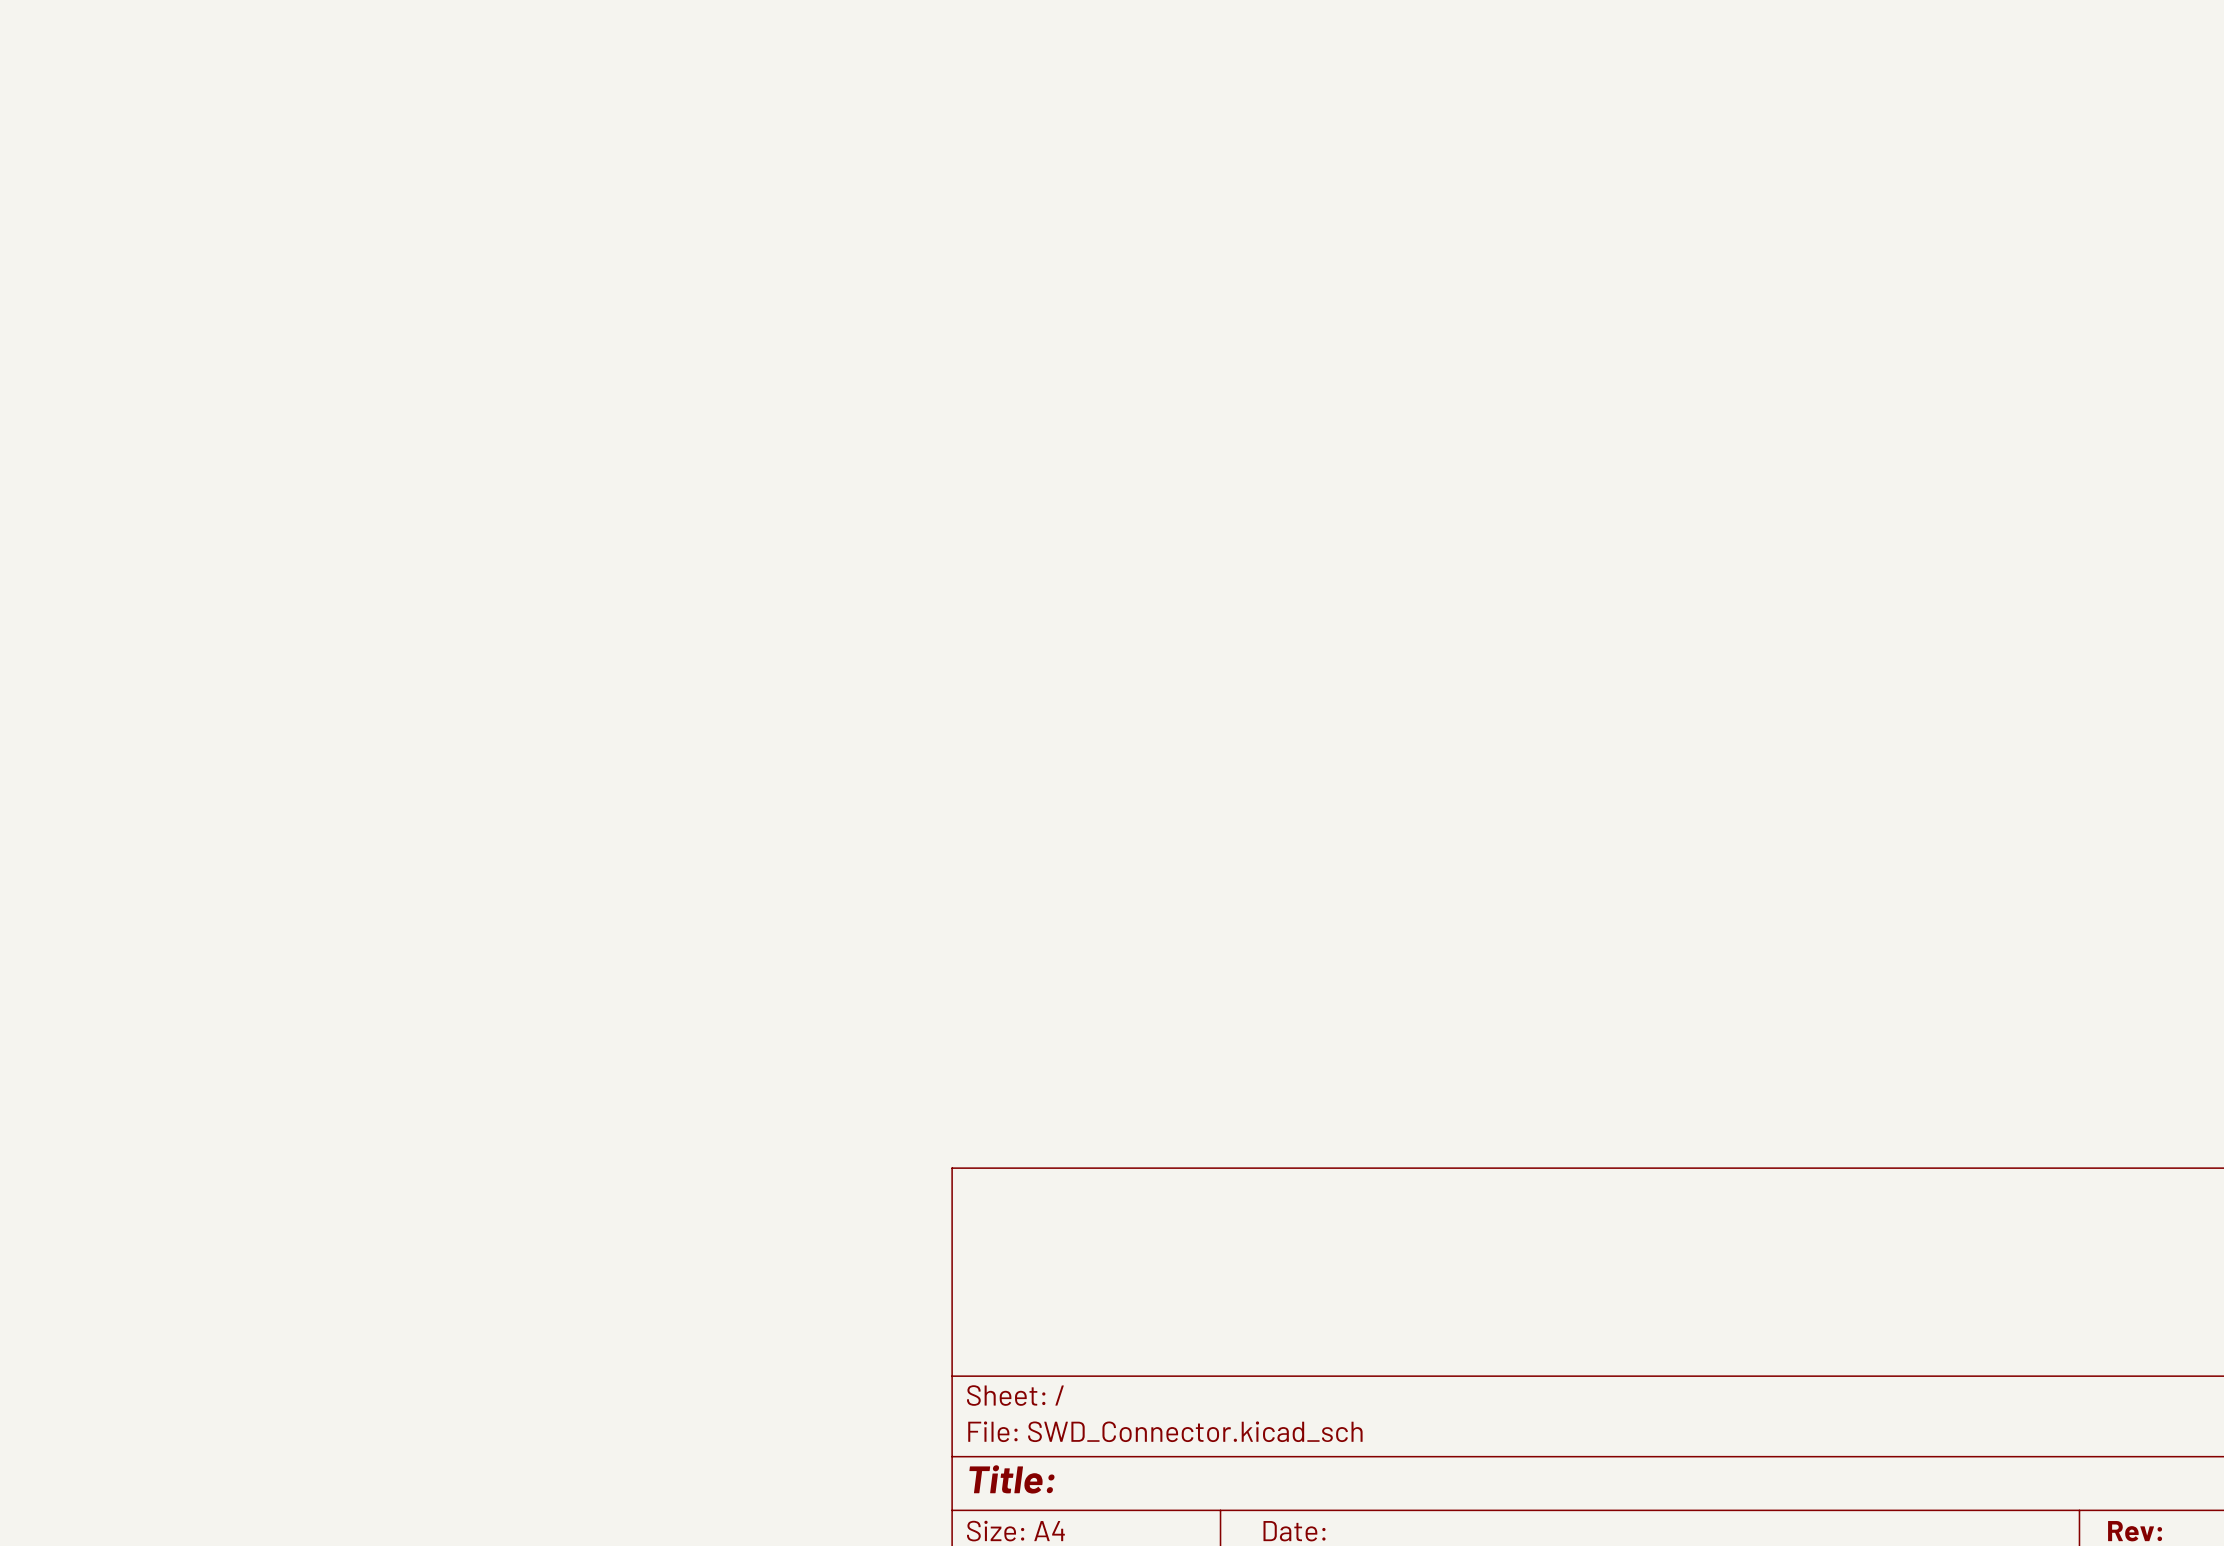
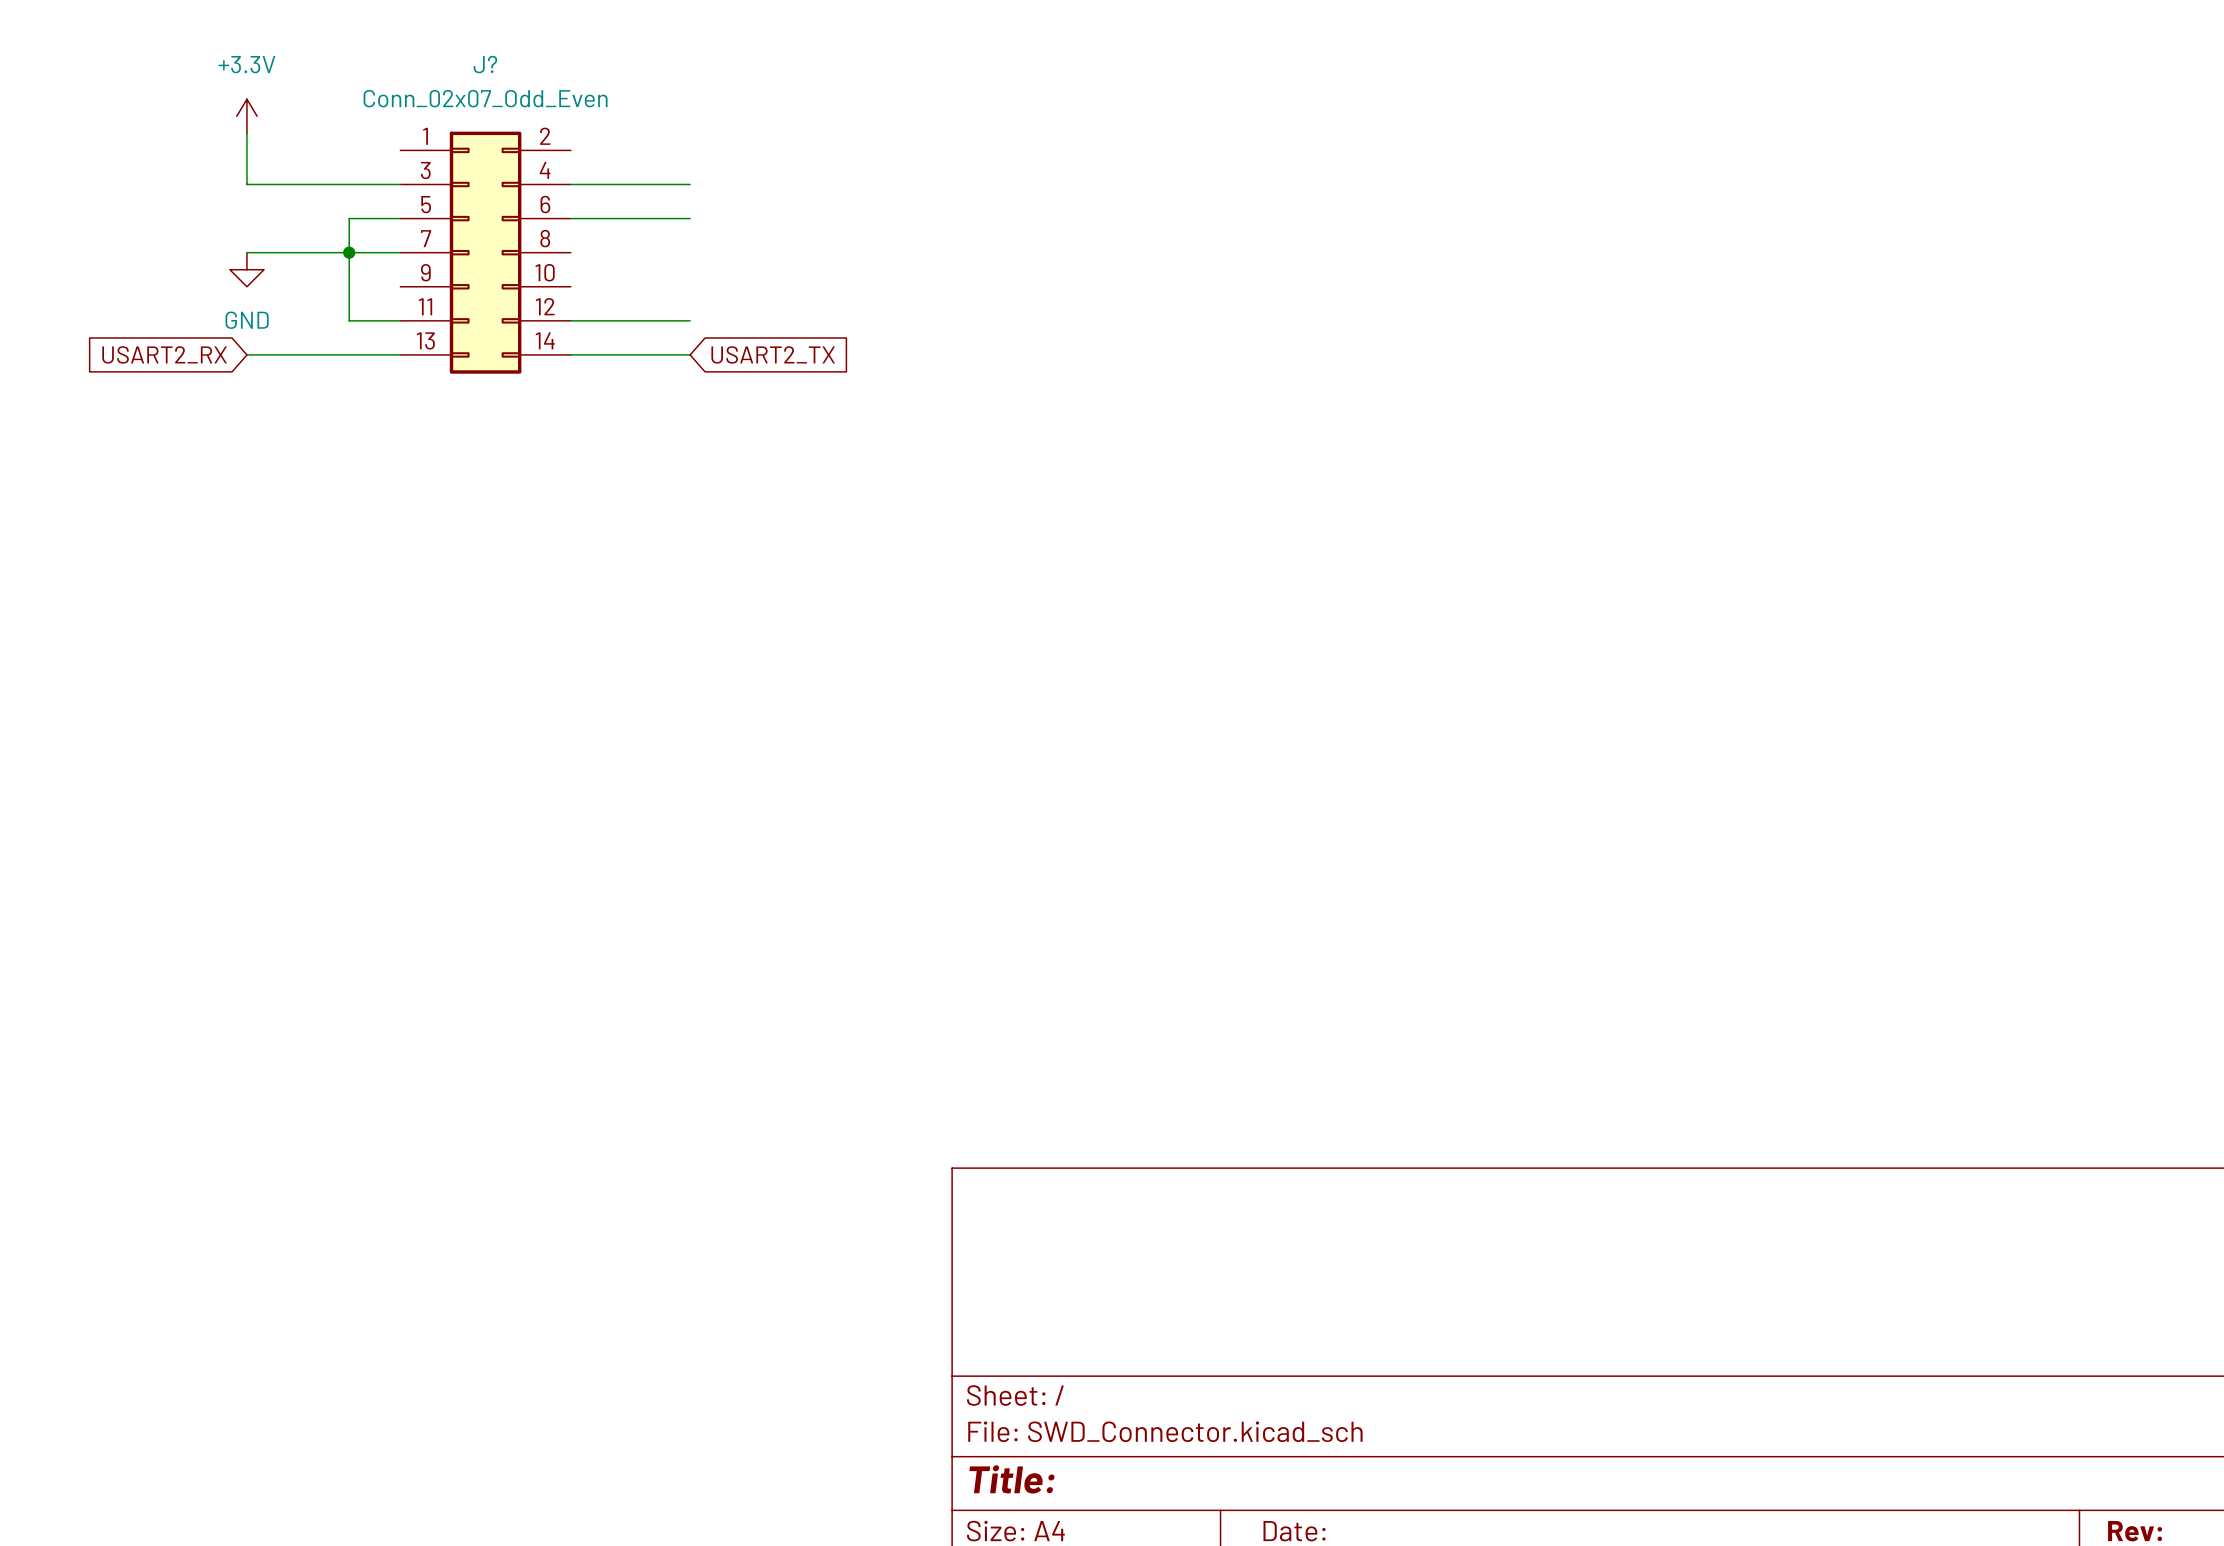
power symbol: none -> +3.3V (246, 116)
wire: none -> (246, 133) (246, 184) (400, 184)
wire: none -> (570, 184) (690, 184)
wire: none -> (400, 218) (349, 218) (349, 320) (400, 320)
wire: none -> (570, 218) (690, 218)
wire: none -> (246, 252) (400, 252)
junction: none -> (349, 252)
J?: none -> Conn_02x07_Odd_Even (485, 252)
power symbol: none -> GND (246, 269)
wire: none -> (570, 320) (690, 320)
global label: none -> USART2_RX (164, 354)
wire: none -> (246, 354) (400, 354)
wire: none -> (570, 354) (690, 354)
global label: none -> USART2_TX (773, 354)

